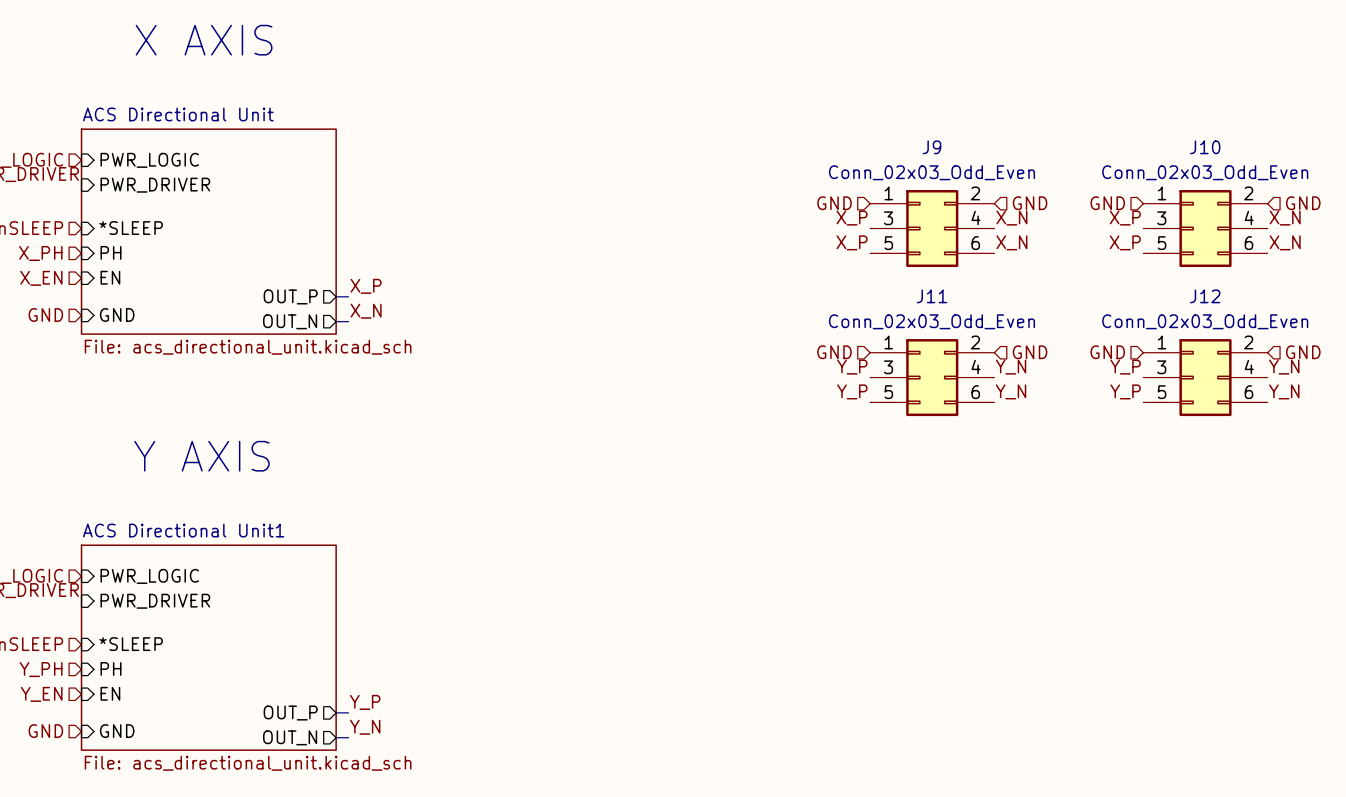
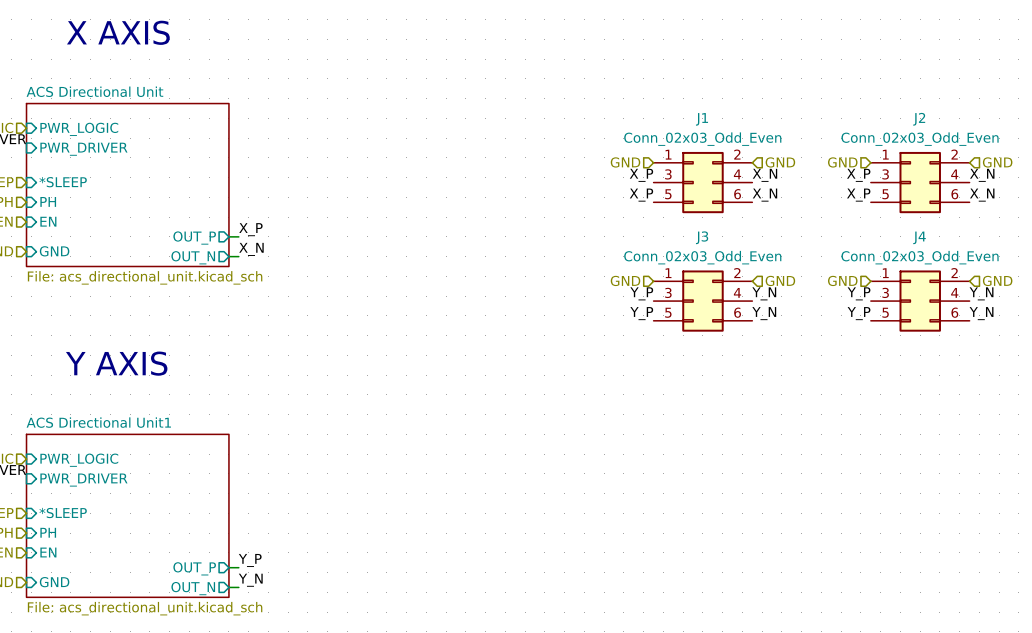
J9 name: J9 (931, 147) -> J1 (702, 119)
J10 name: J10 (1205, 147) -> J2 (919, 119)
J11 name: J11 (931, 296) -> J3 (702, 237)
J12 name: J12 (1205, 296) -> J4 (919, 237)

